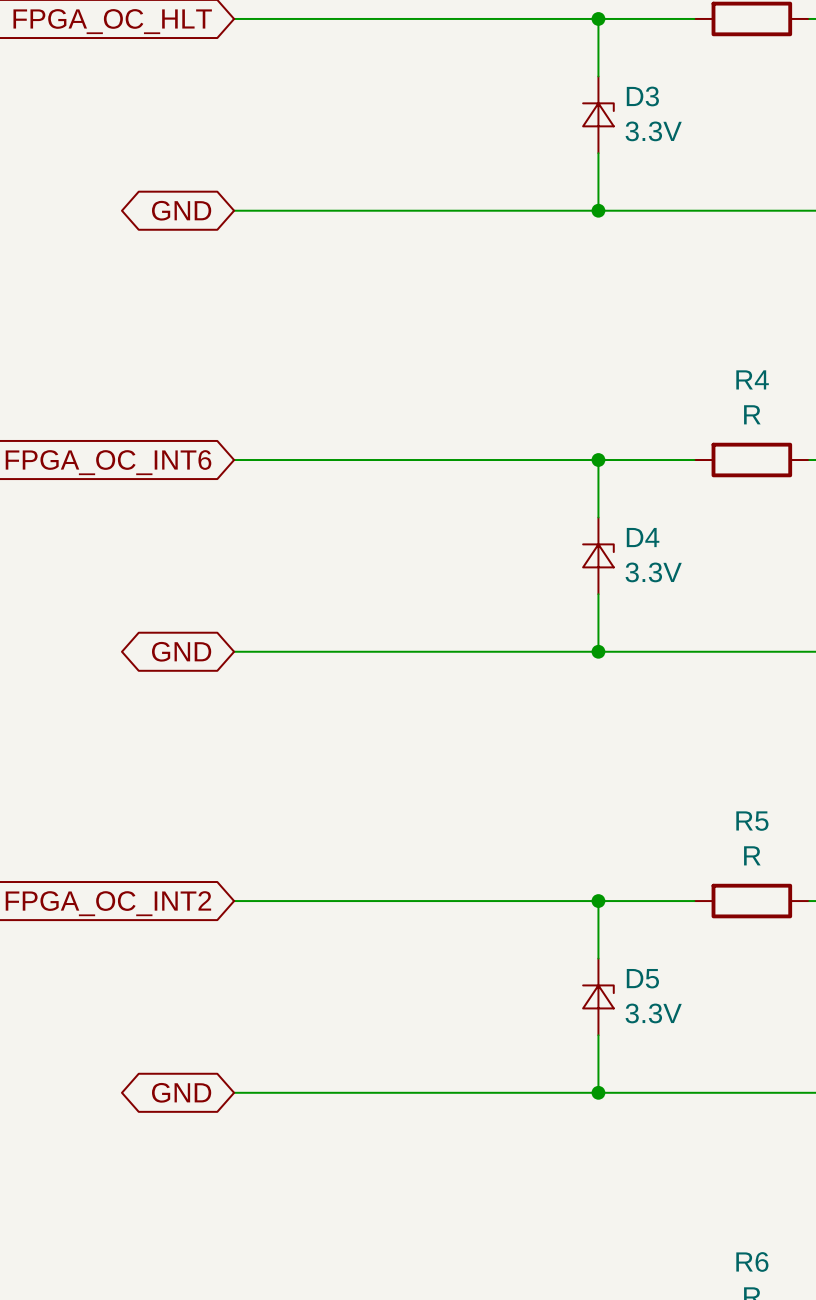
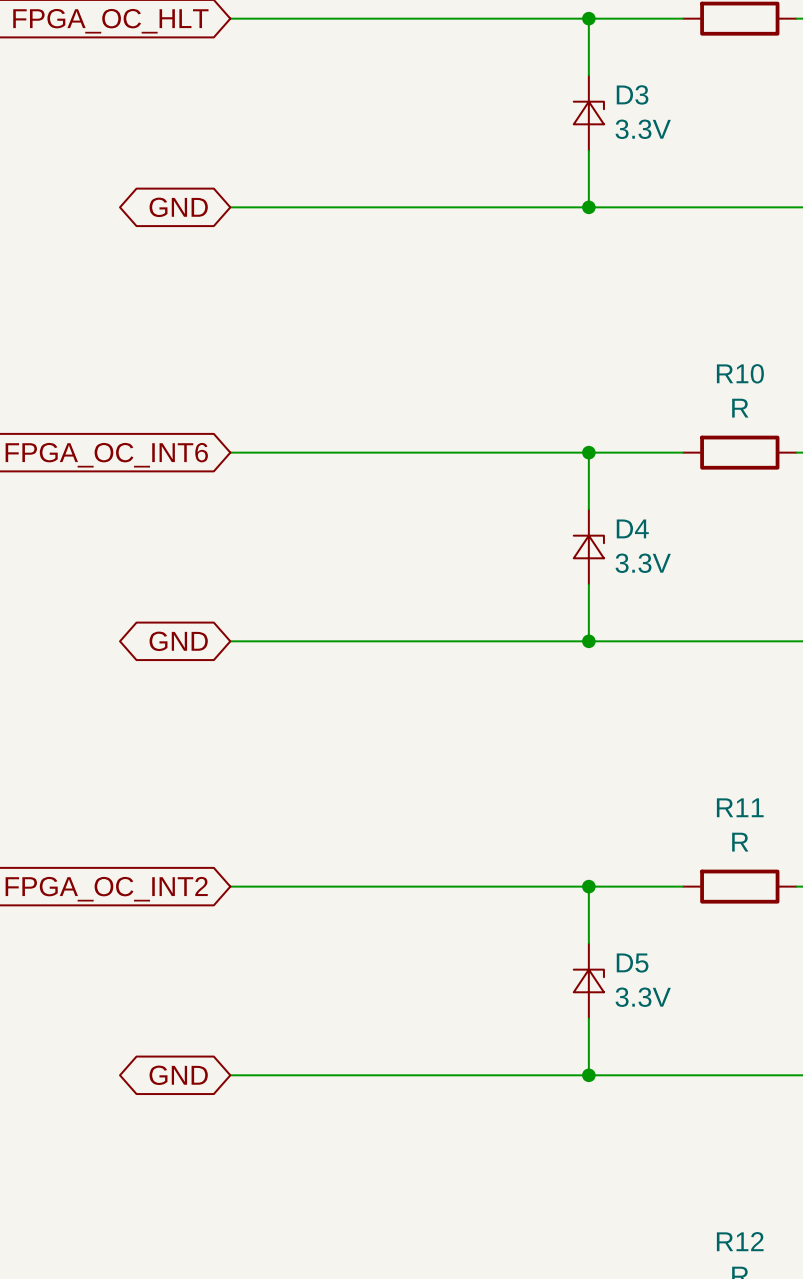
R4 name: R4 (752, 379) -> R10 (740, 373)
R5 name: R5 (752, 821) -> R11 (740, 807)
R6 name: R6 (752, 1261) -> R12 (740, 1241)

